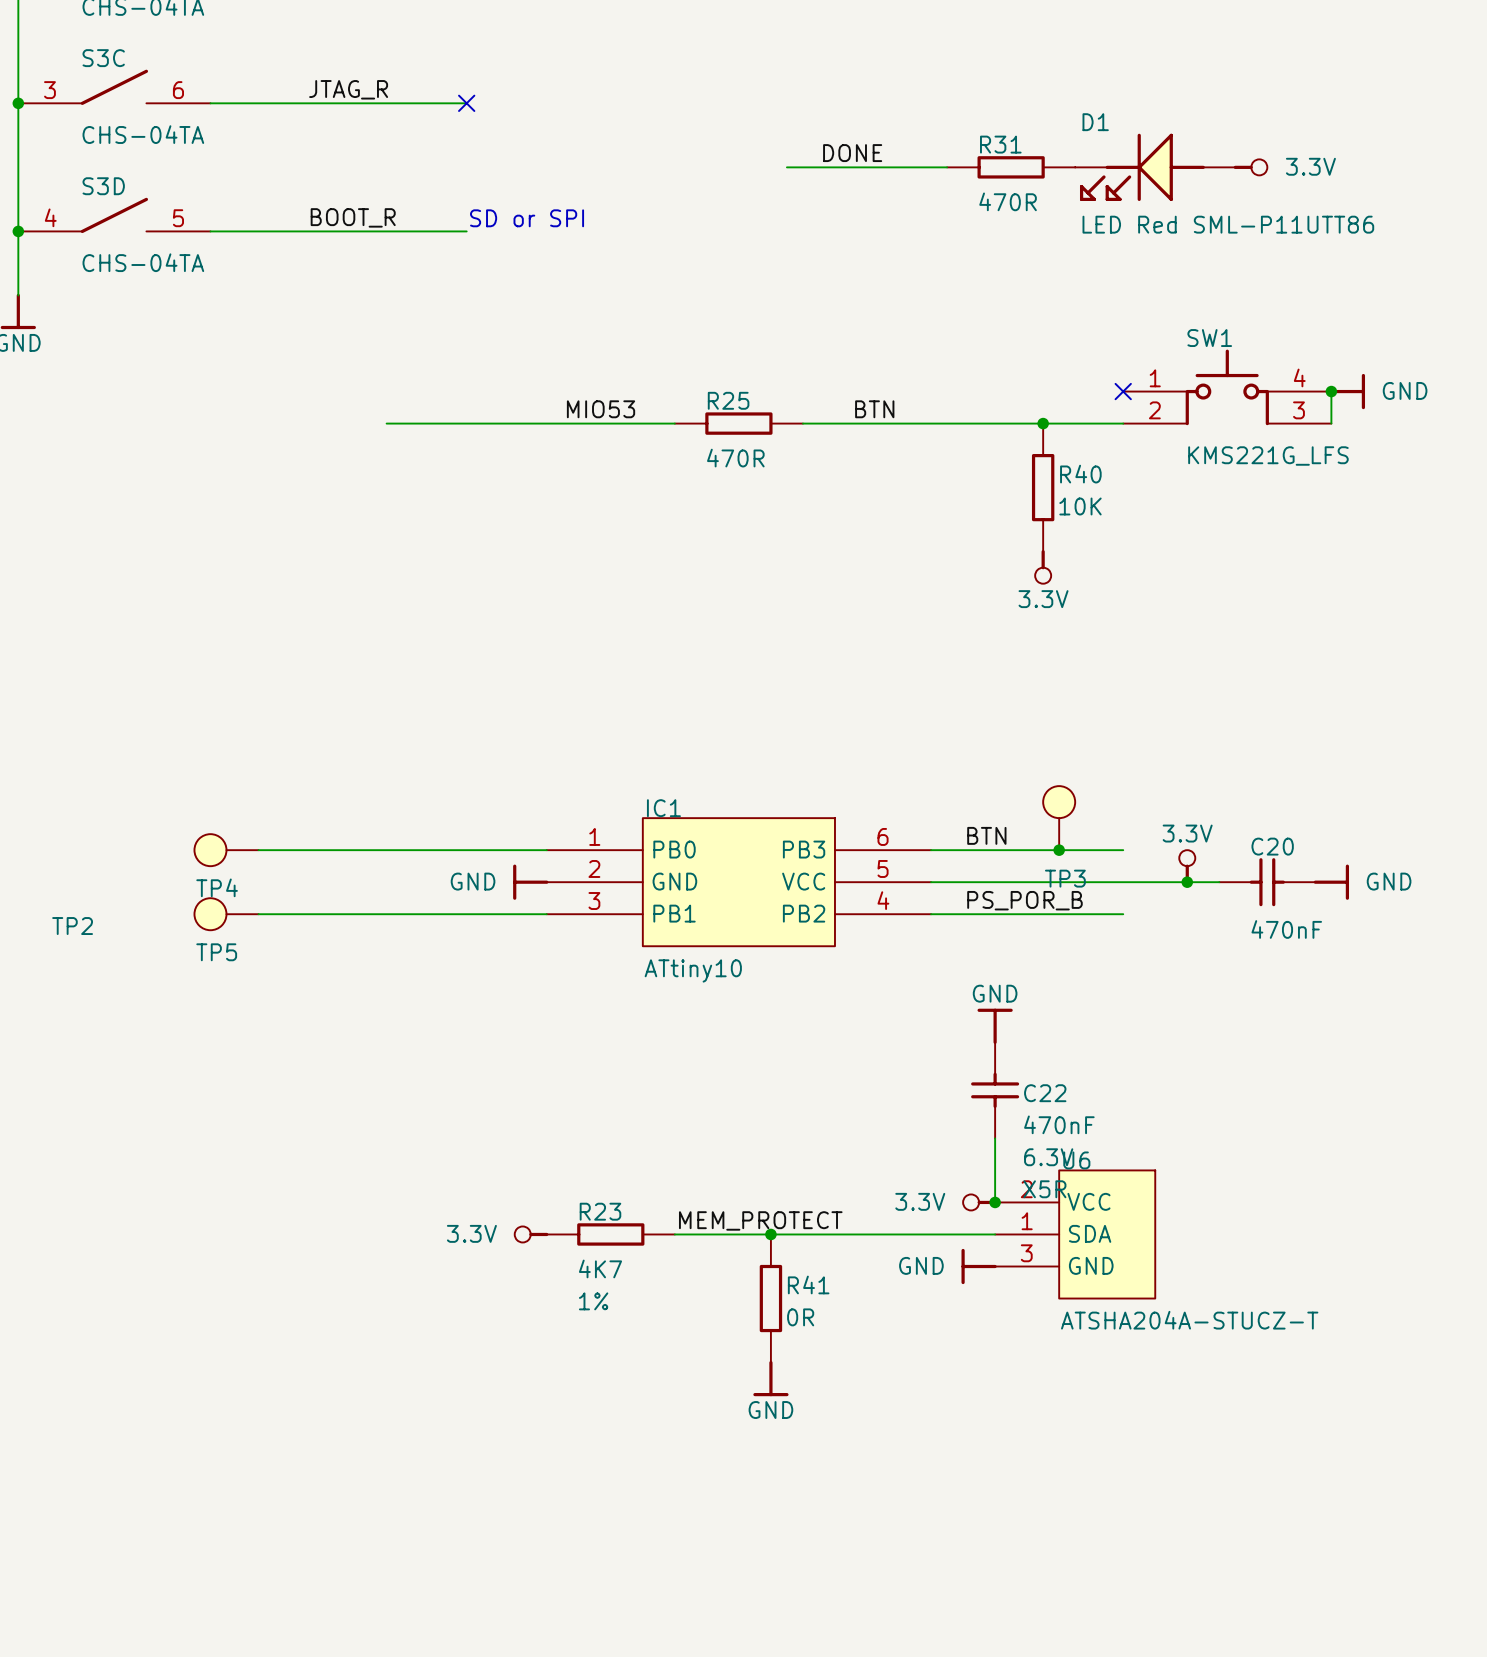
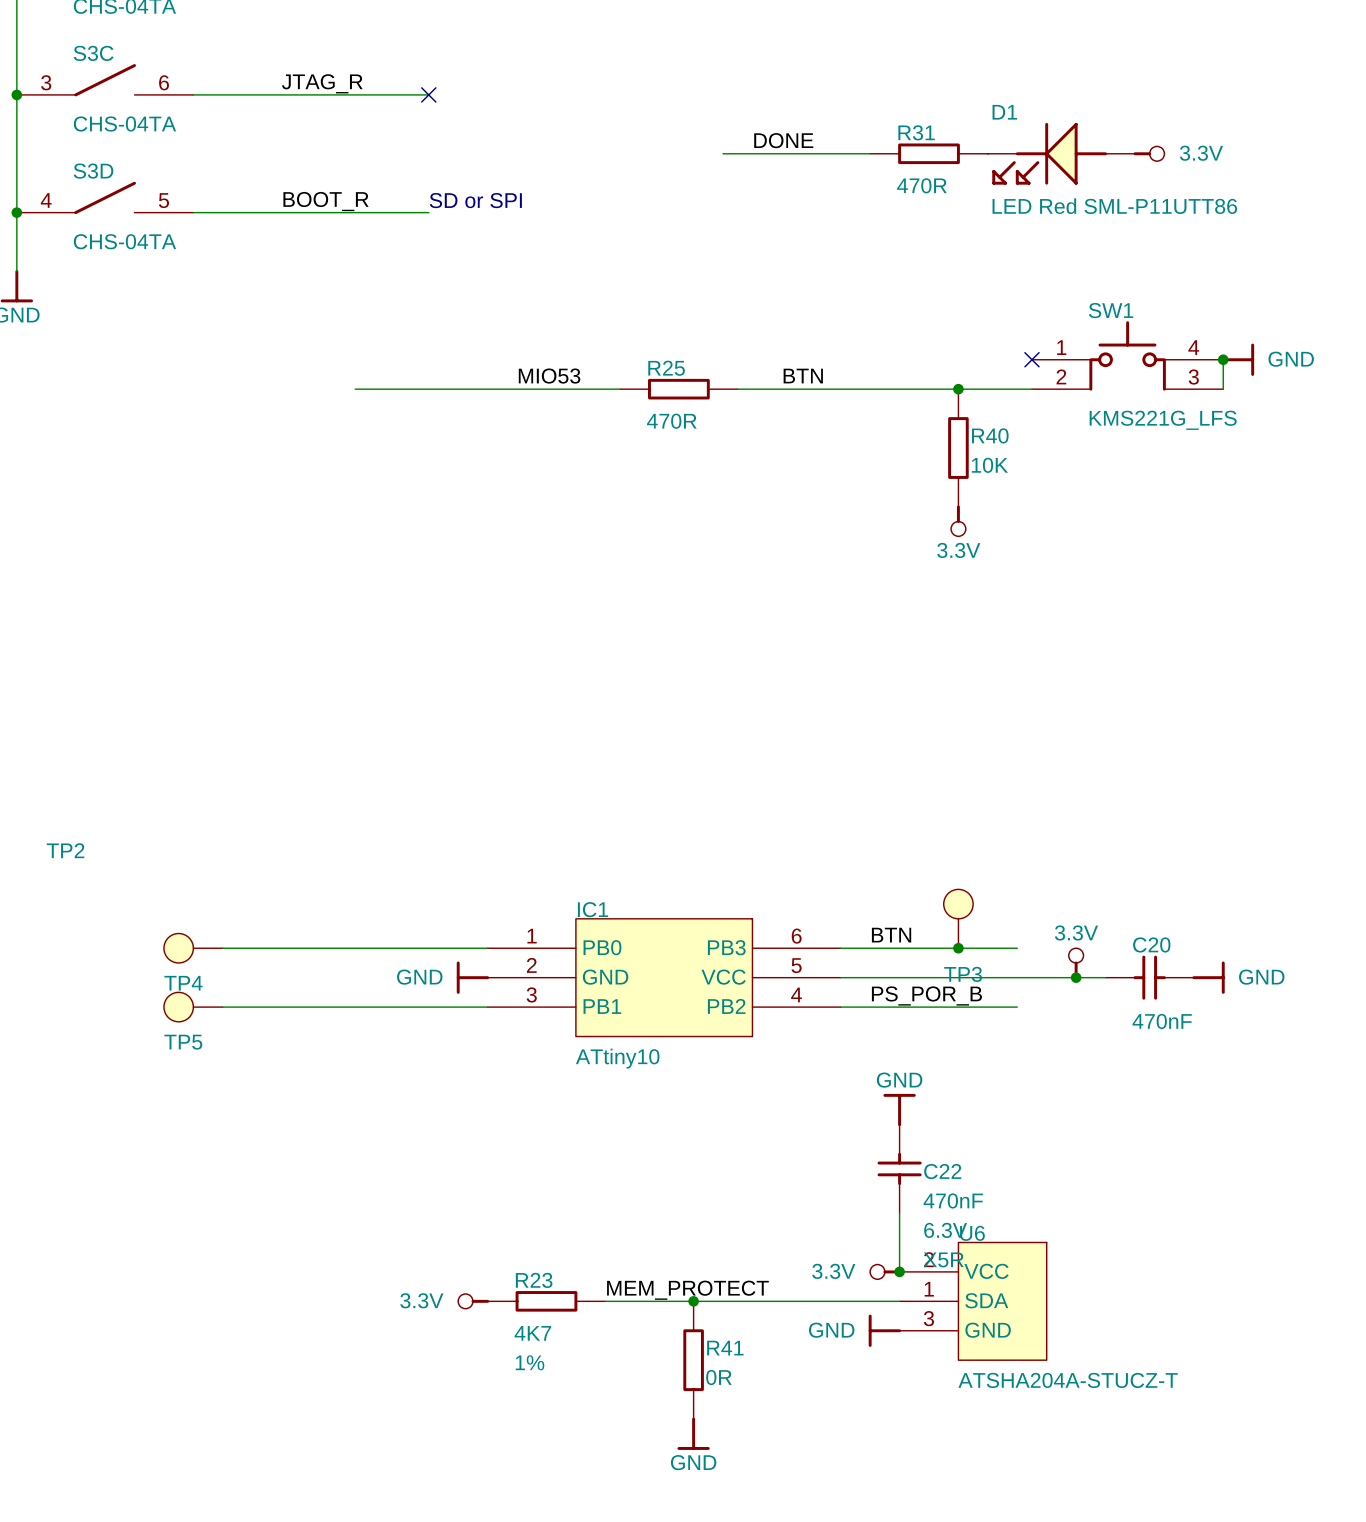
TP3 position: (1059, 818) -> (958, 918)
label position: BTN (986, 835) -> BTN (891, 935)
TP4 position: (226, 850) -> (193, 948)
wire: (258, 850) (546, 850) -> (222, 948) (487, 948)
wire: (931, 850) (1123, 850) -> (840, 948) (1017, 948)
junction: (1059, 850) -> none
power symbol position: 3.3V (1187, 866) -> 3.3V (1076, 963)
power symbol position: GND (530, 882) -> GND (472, 977)
IC1 position: (738, 882) -> (664, 977)
wire: (931, 882) (1219, 882) -> (840, 977) (1105, 977)
junction: (1187, 882) -> none
C20 position: (1267, 882) -> (1149, 977)
power symbol: GND (1331, 882) -> none
label position: PS_POR_B (1024, 900) -> PS_POR_B (926, 995)
TP5 position: (226, 914) -> (193, 1007)
wire: (258, 914) (546, 914) -> (222, 1007) (487, 1007)
wire: (931, 914) (1123, 914) -> (840, 1007) (1017, 1007)
power symbol: GND (995, 1026) -> none
junction: none -> (958, 948)
junction: none -> (1076, 977)
power symbol: none -> GND (1208, 977)
C22 position: (995, 1090) -> (899, 1168)
wire: (995, 1138) (995, 1202) -> (899, 1213) (899, 1271)
power symbol: 3.3V (979, 1202) -> GND (899, 1110)
junction: (995, 1202) -> none
label position: MEM_PROTECT (760, 1220) -> MEM_PROTECT (687, 1290)
power symbol position: 3.3V (531, 1234) -> 3.3V (473, 1301)
R23 position: (610, 1234) -> (546, 1301)
wire: (674, 1234) (995, 1234) -> (605, 1301) (899, 1301)
junction: (770, 1234) -> none
U6 position: (1075, 1234) -> (973, 1301)
power symbol: GND (979, 1266) -> none
R41 position: (770, 1298) -> (693, 1360)
power symbol: GND (770, 1378) -> none
power symbol: none -> 3.3V (885, 1271)
junction: none -> (899, 1271)
junction: none -> (693, 1301)
power symbol: none -> GND (884, 1330)
power symbol: none -> GND (693, 1433)

